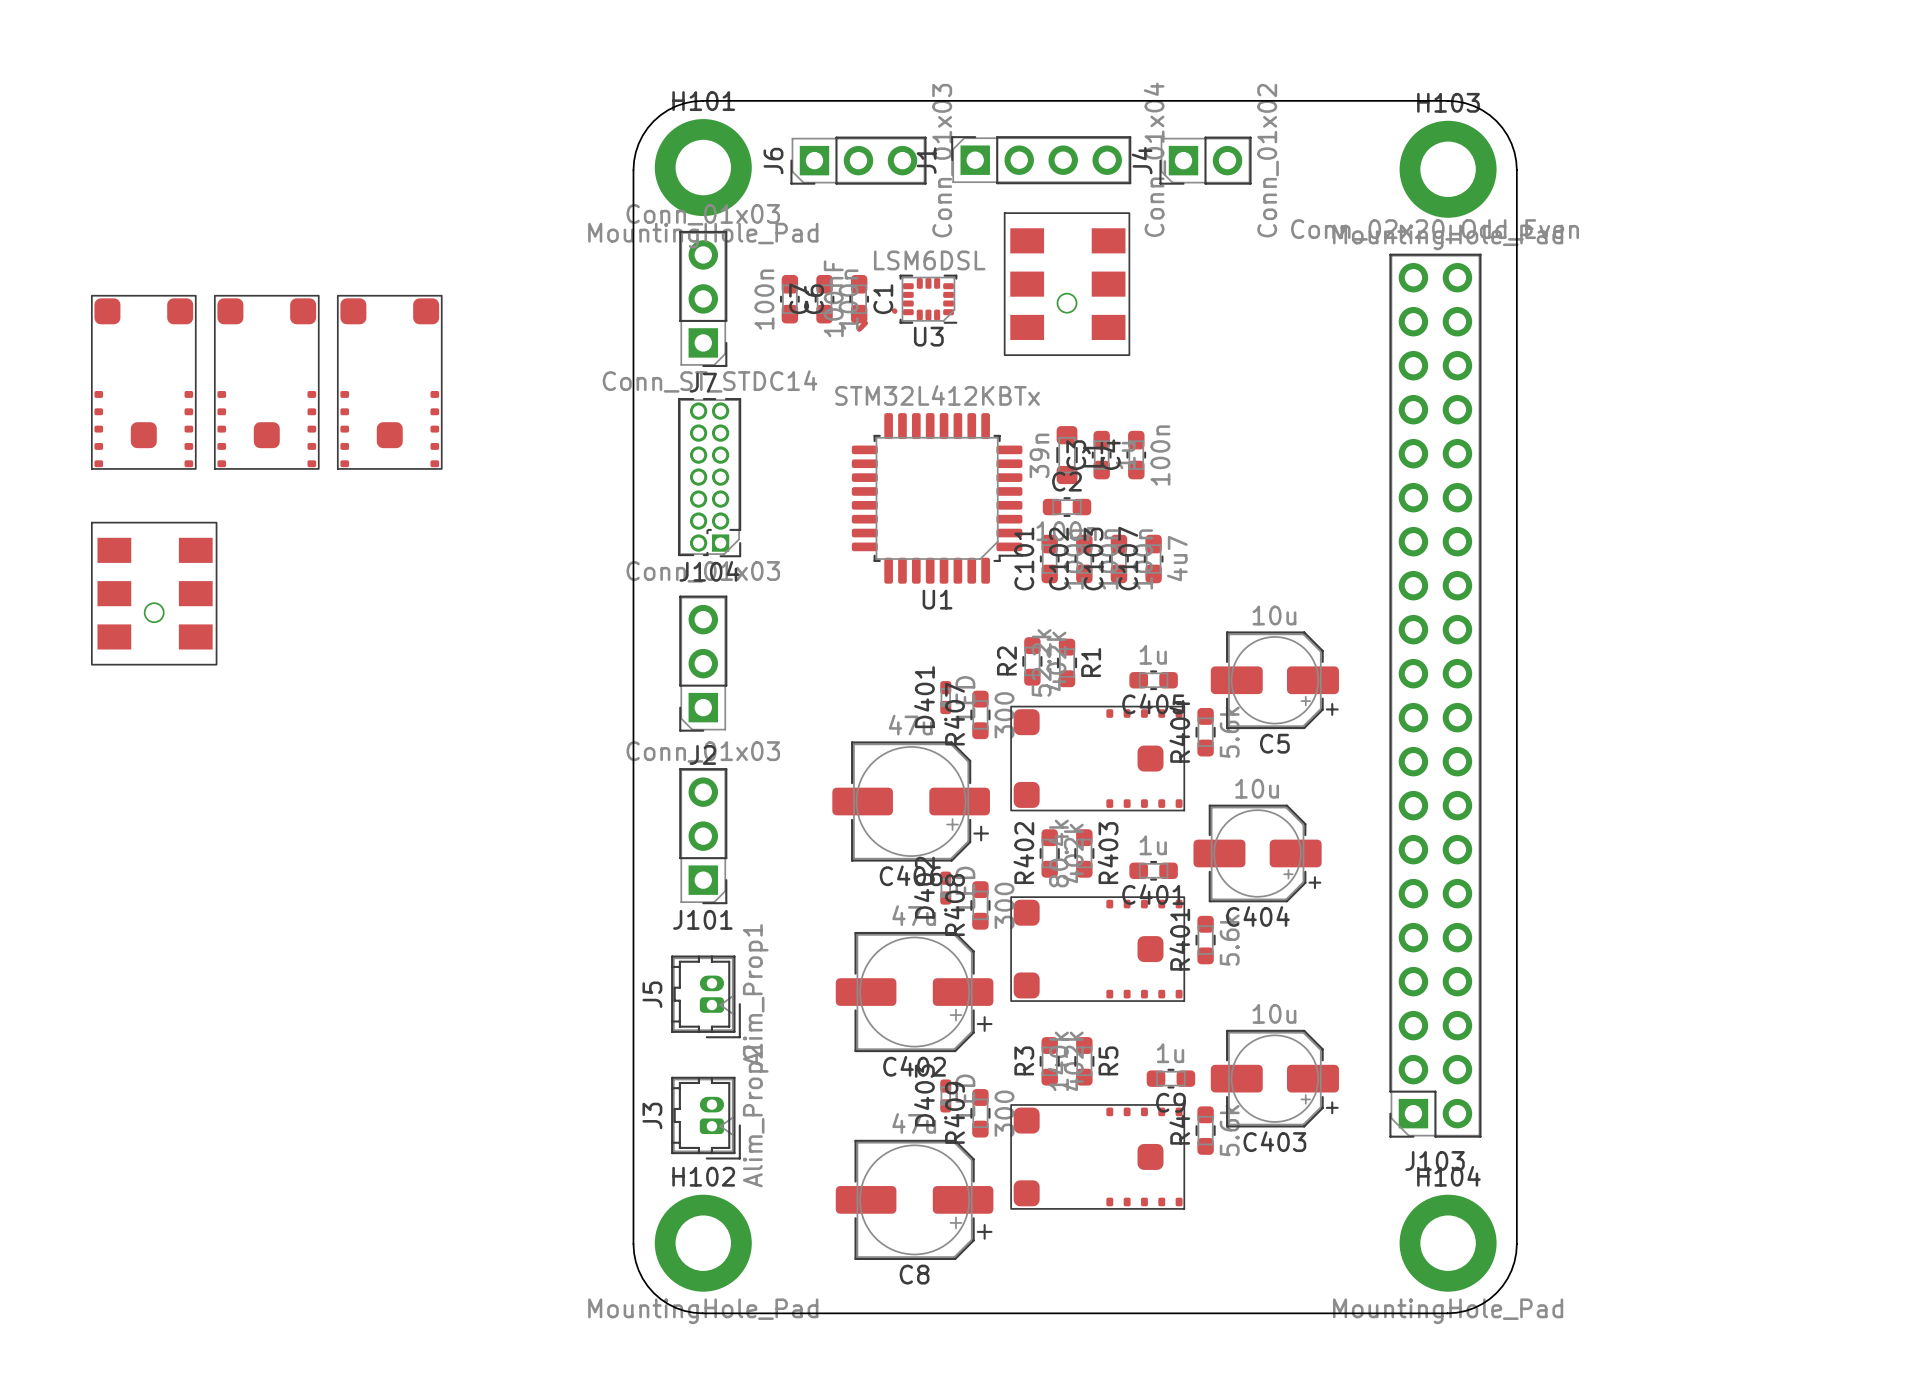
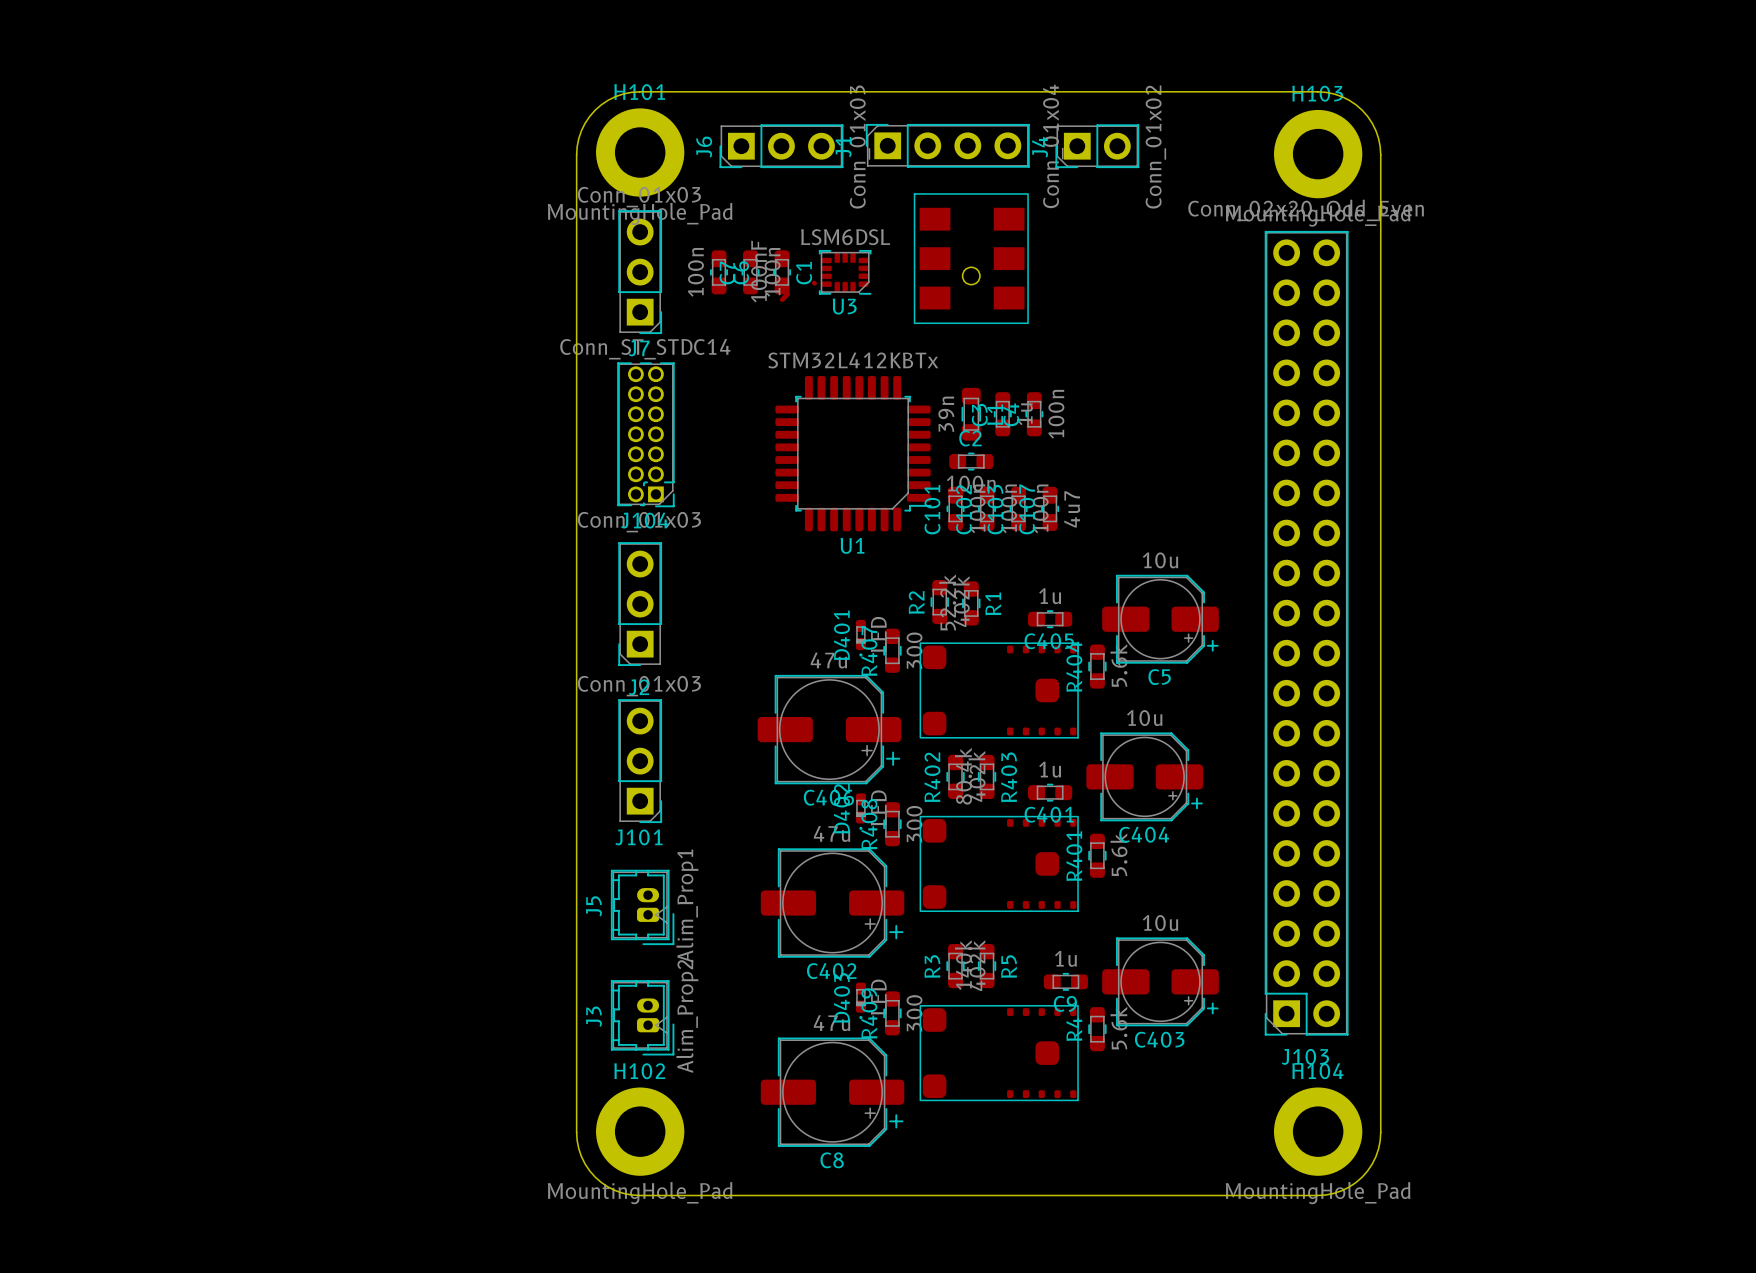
part: (143, 382) -> none
part: (266, 382) -> none
part: (389, 382) -> none
part: (154, 593) -> none

